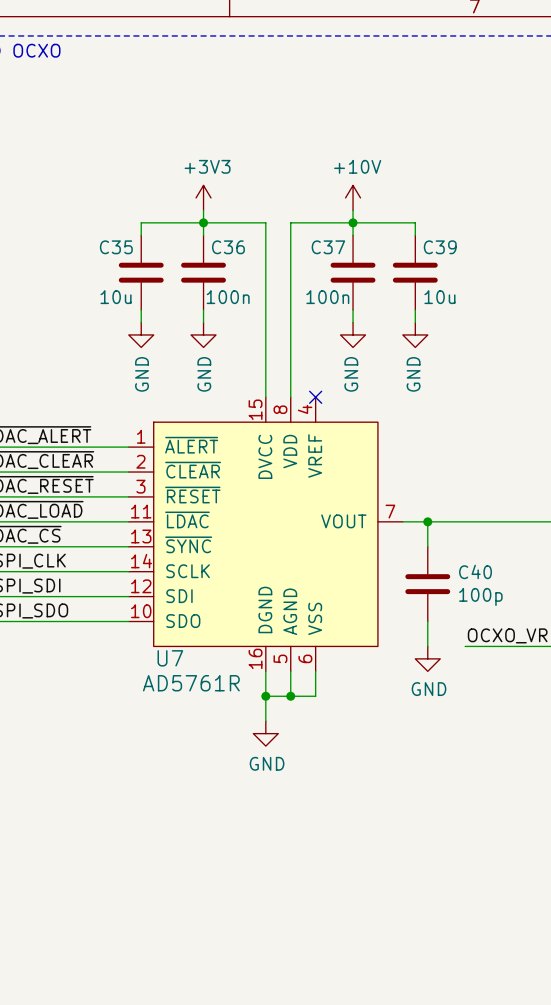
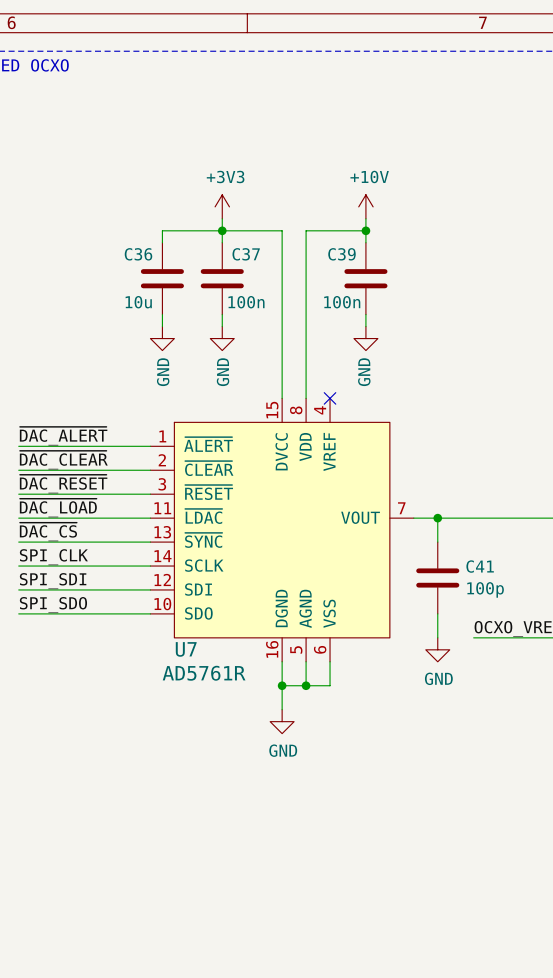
wire: (353, 222) (415, 222) (415, 235) -> none
C35 name: C35 (116, 247) -> C36 (138, 254)
C36 name: C36 (228, 247) -> C37 (246, 254)
C37 name: C37 (328, 247) -> C39 (341, 254)
C39: 10u (415, 272) -> none
wire: (415, 310) (415, 322) -> none
power symbol: GND (415, 334) -> none
C40 name: C40 (475, 571) -> C41 (480, 566)

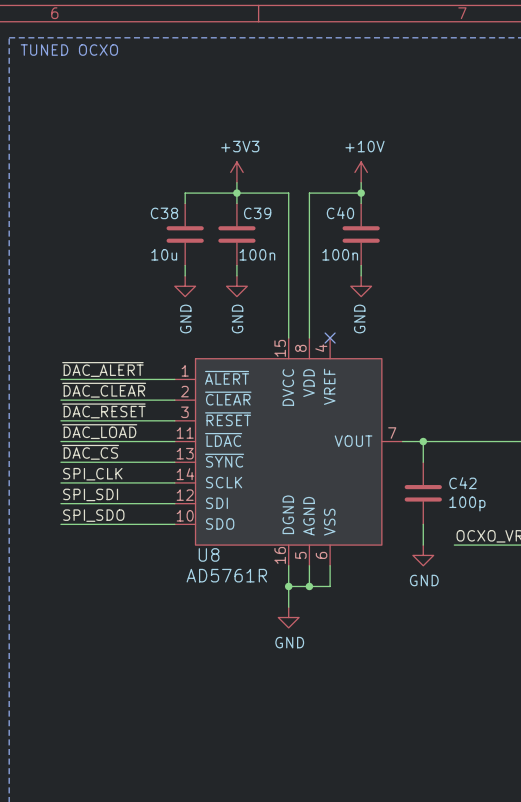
C36 name: C36 (138, 254) -> C38 (164, 213)
C37 name: C37 (246, 254) -> C39 (257, 213)
C39 name: C39 (341, 254) -> C40 (340, 213)
C41 name: C41 (480, 566) -> C42 (462, 483)
U7 name: U7 (186, 649) -> U8 (209, 554)

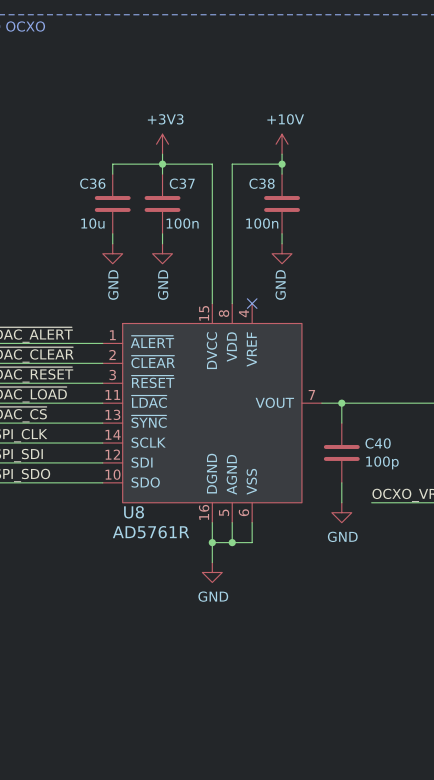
C38 name: C38 (164, 213) -> C36 (92, 183)
C39 name: C39 (257, 213) -> C37 (182, 183)
C40 name: C40 (340, 213) -> C38 (262, 183)
C42 name: C42 (462, 483) -> C40 (378, 443)

